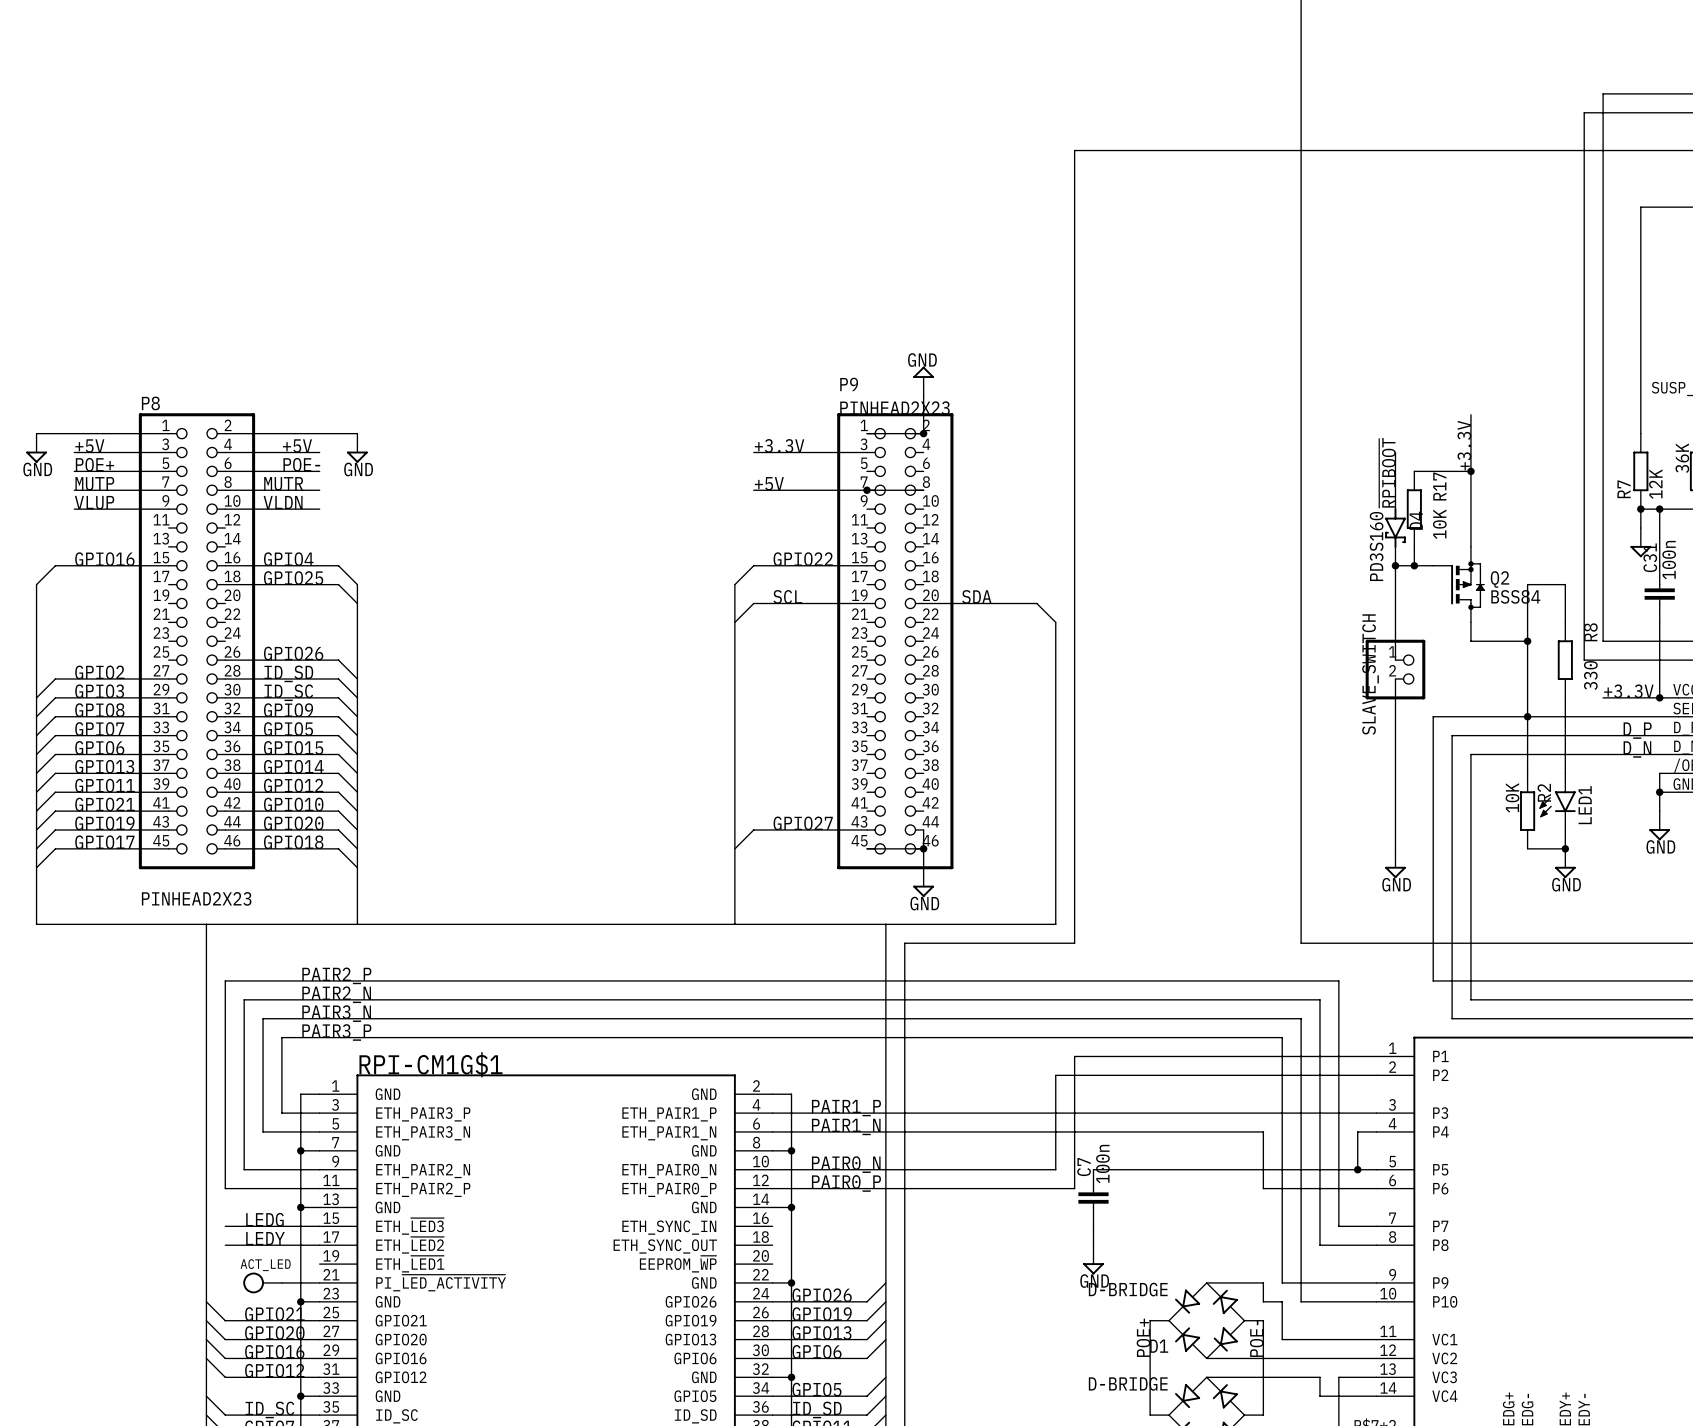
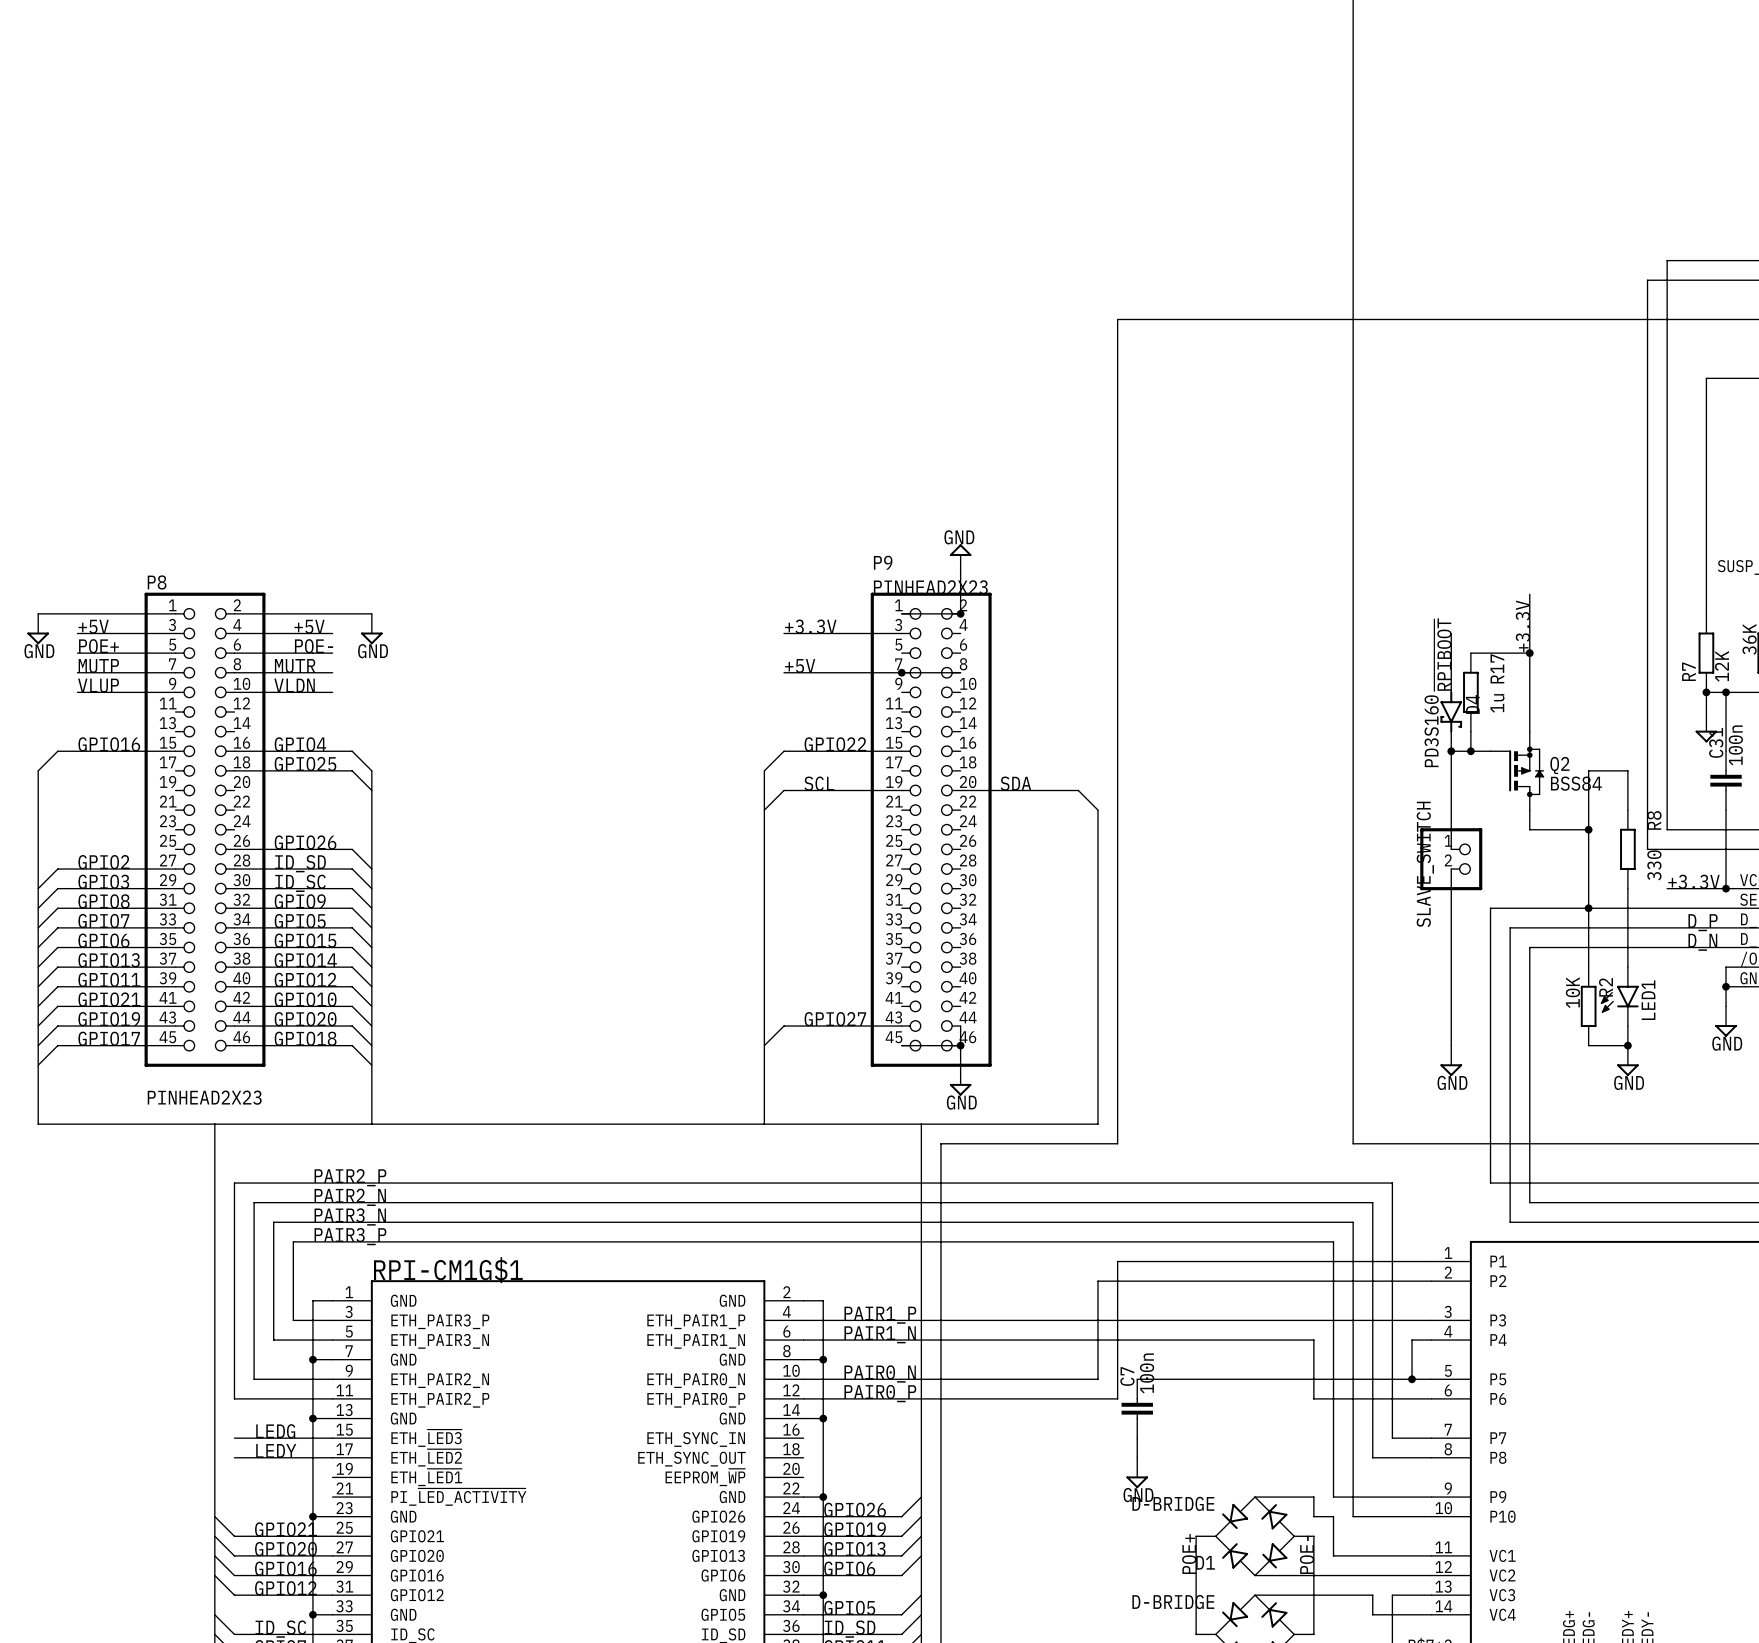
R17 value: 10K (1439, 524) -> 1u (1497, 703)
ACT_LED: (262, 1282) -> none
wire: (281, 1282) (319, 1282) -> none

